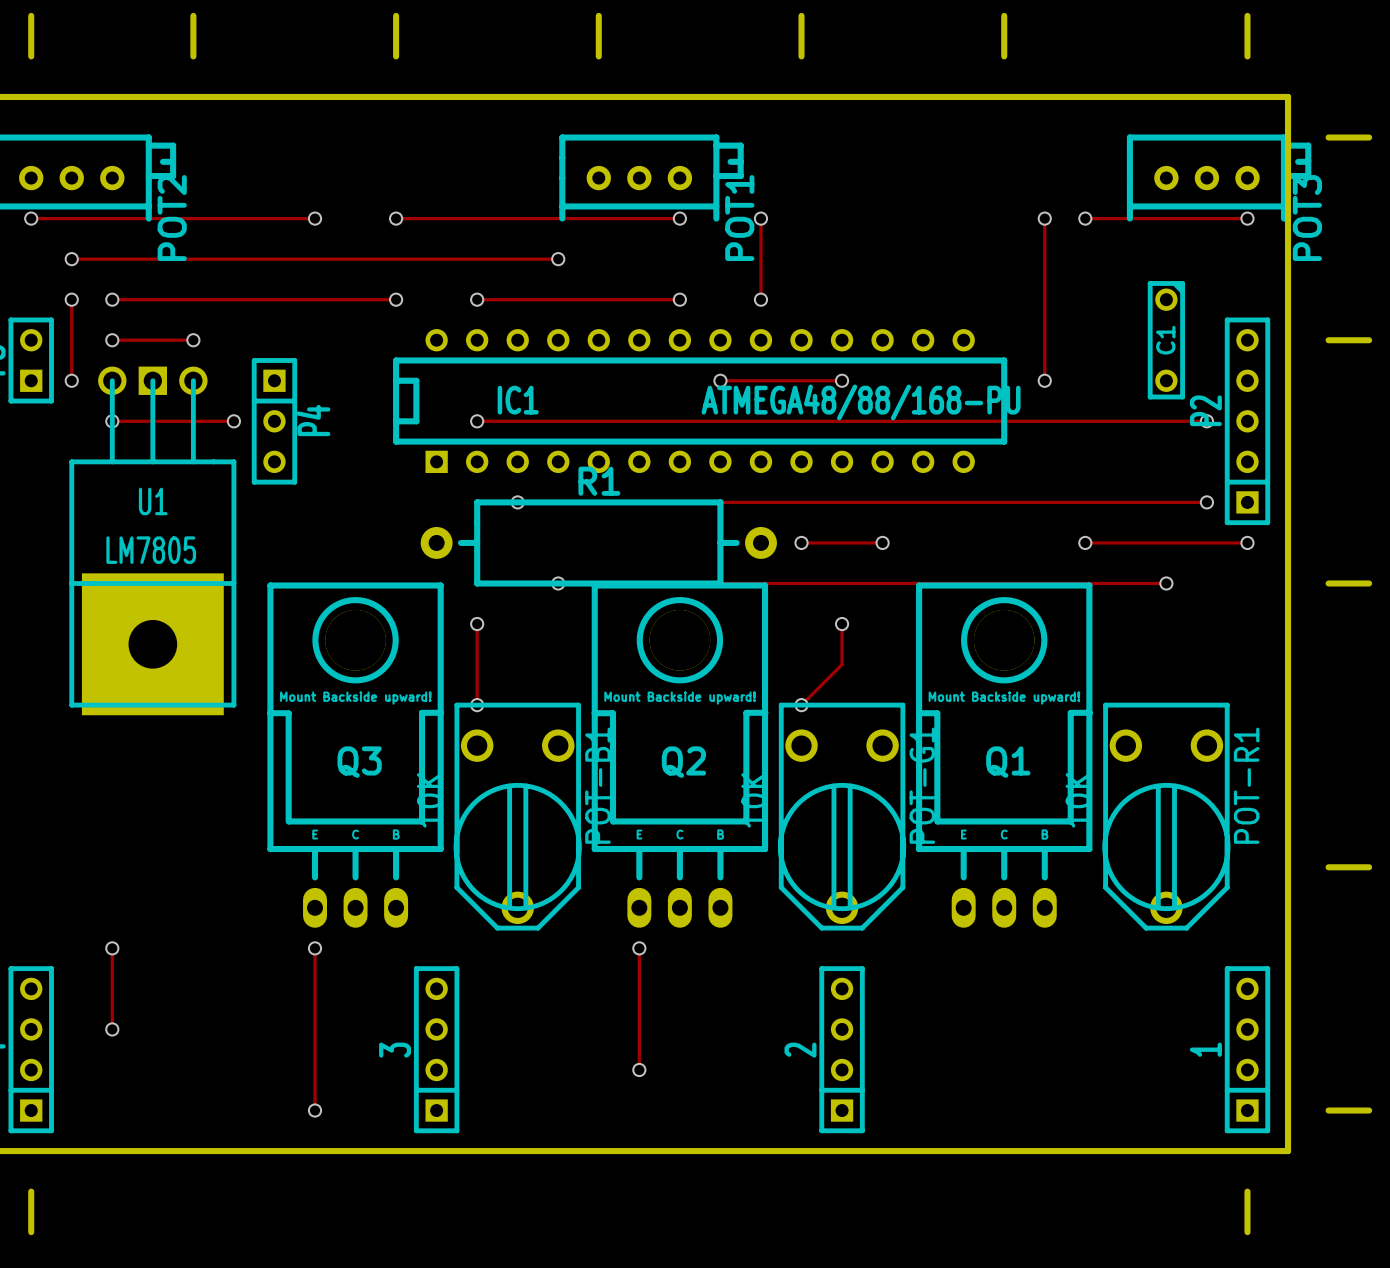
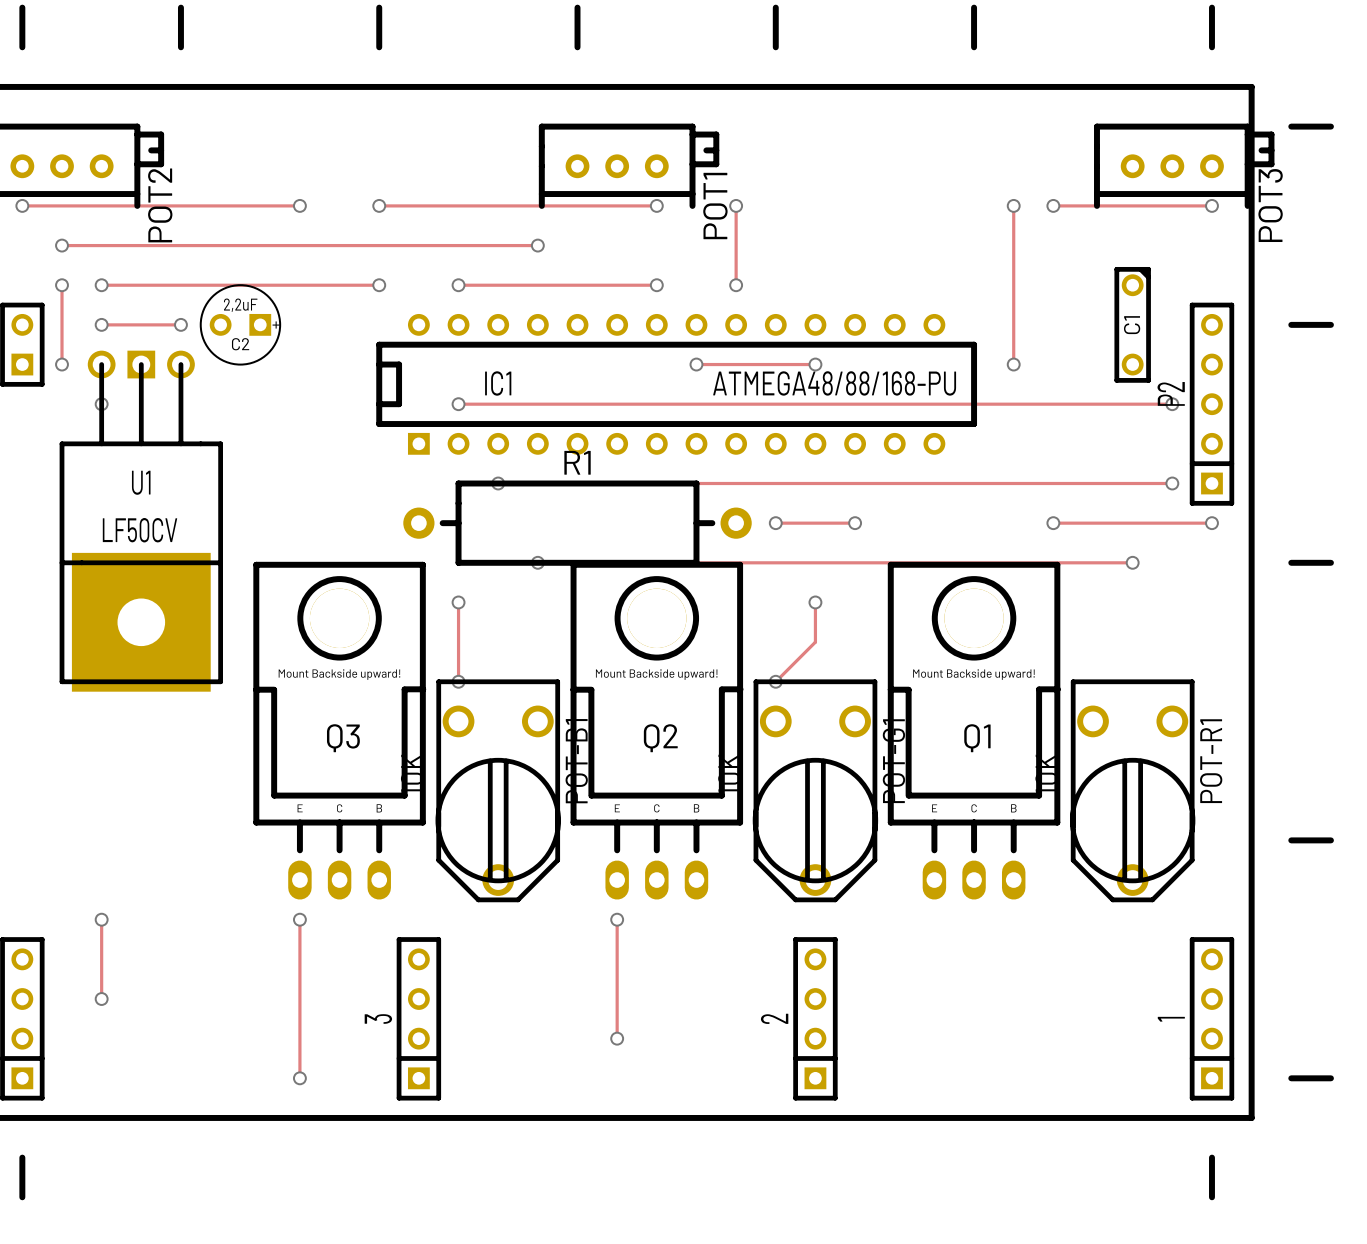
C2: none -> 2,2uF (240, 324)
track: (112, 421) (233, 421) -> none
via: (233, 421) -> none
P4: (274, 421) -> none
U1 value: LM7805 (151, 550) -> LF50CV (140, 530)

